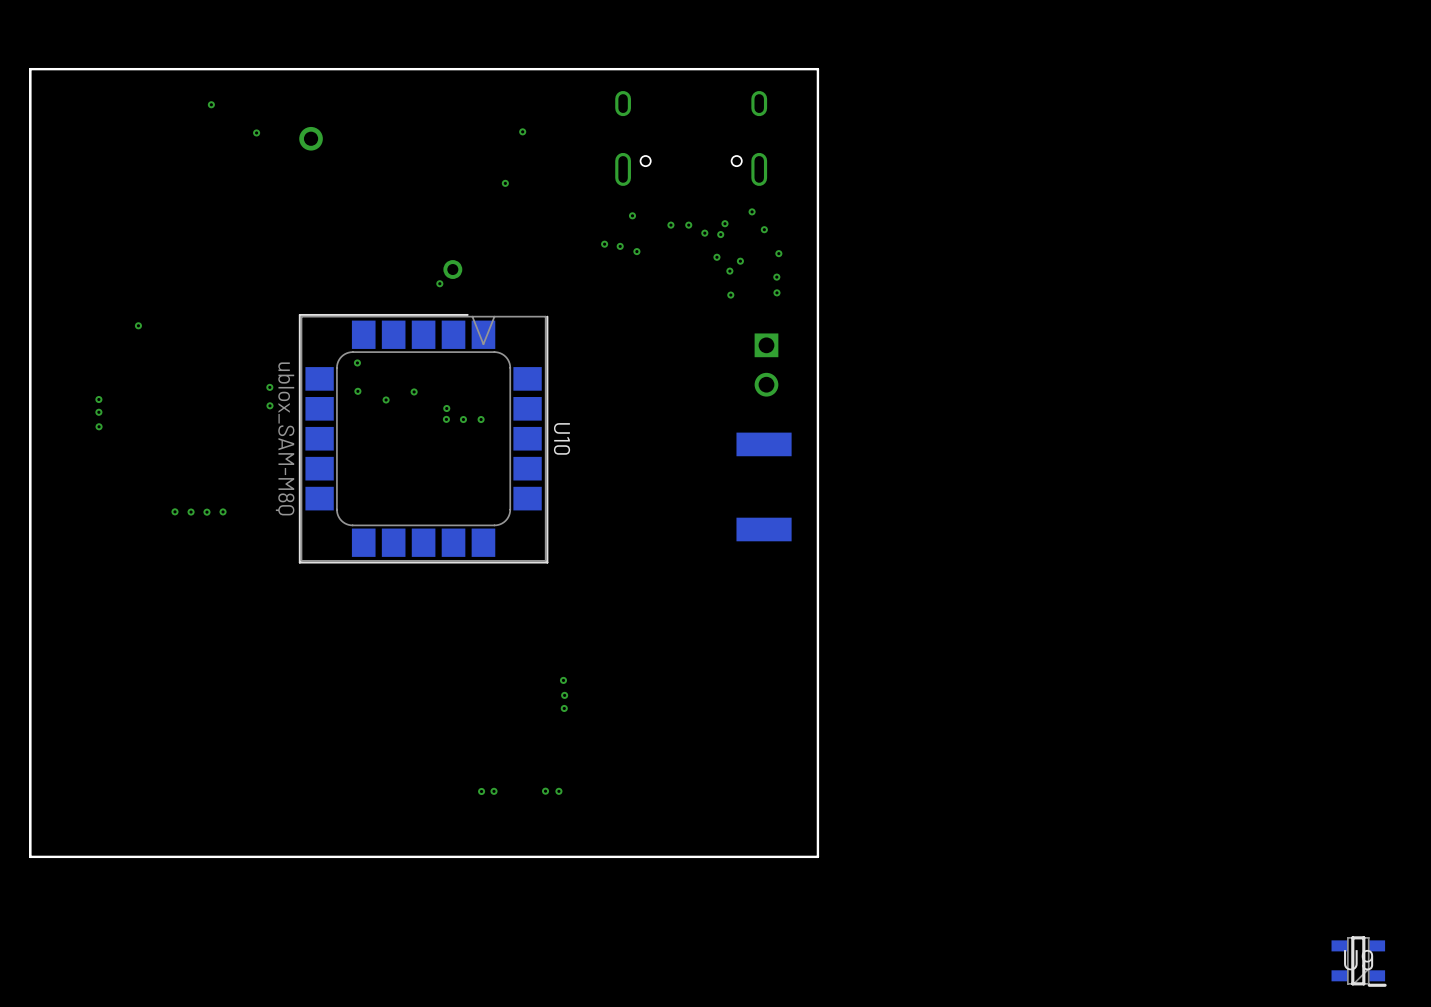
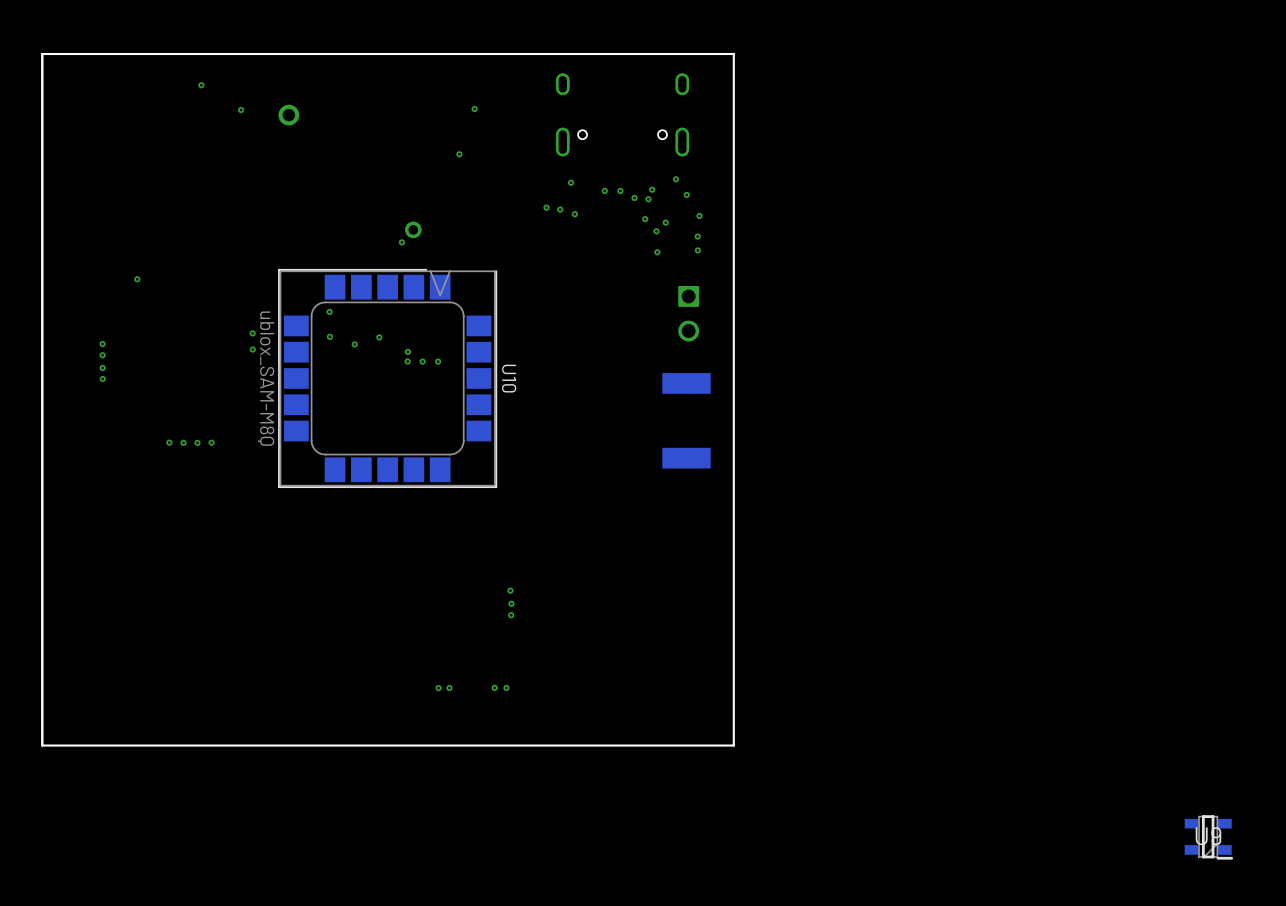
via: none -> (102, 379)

